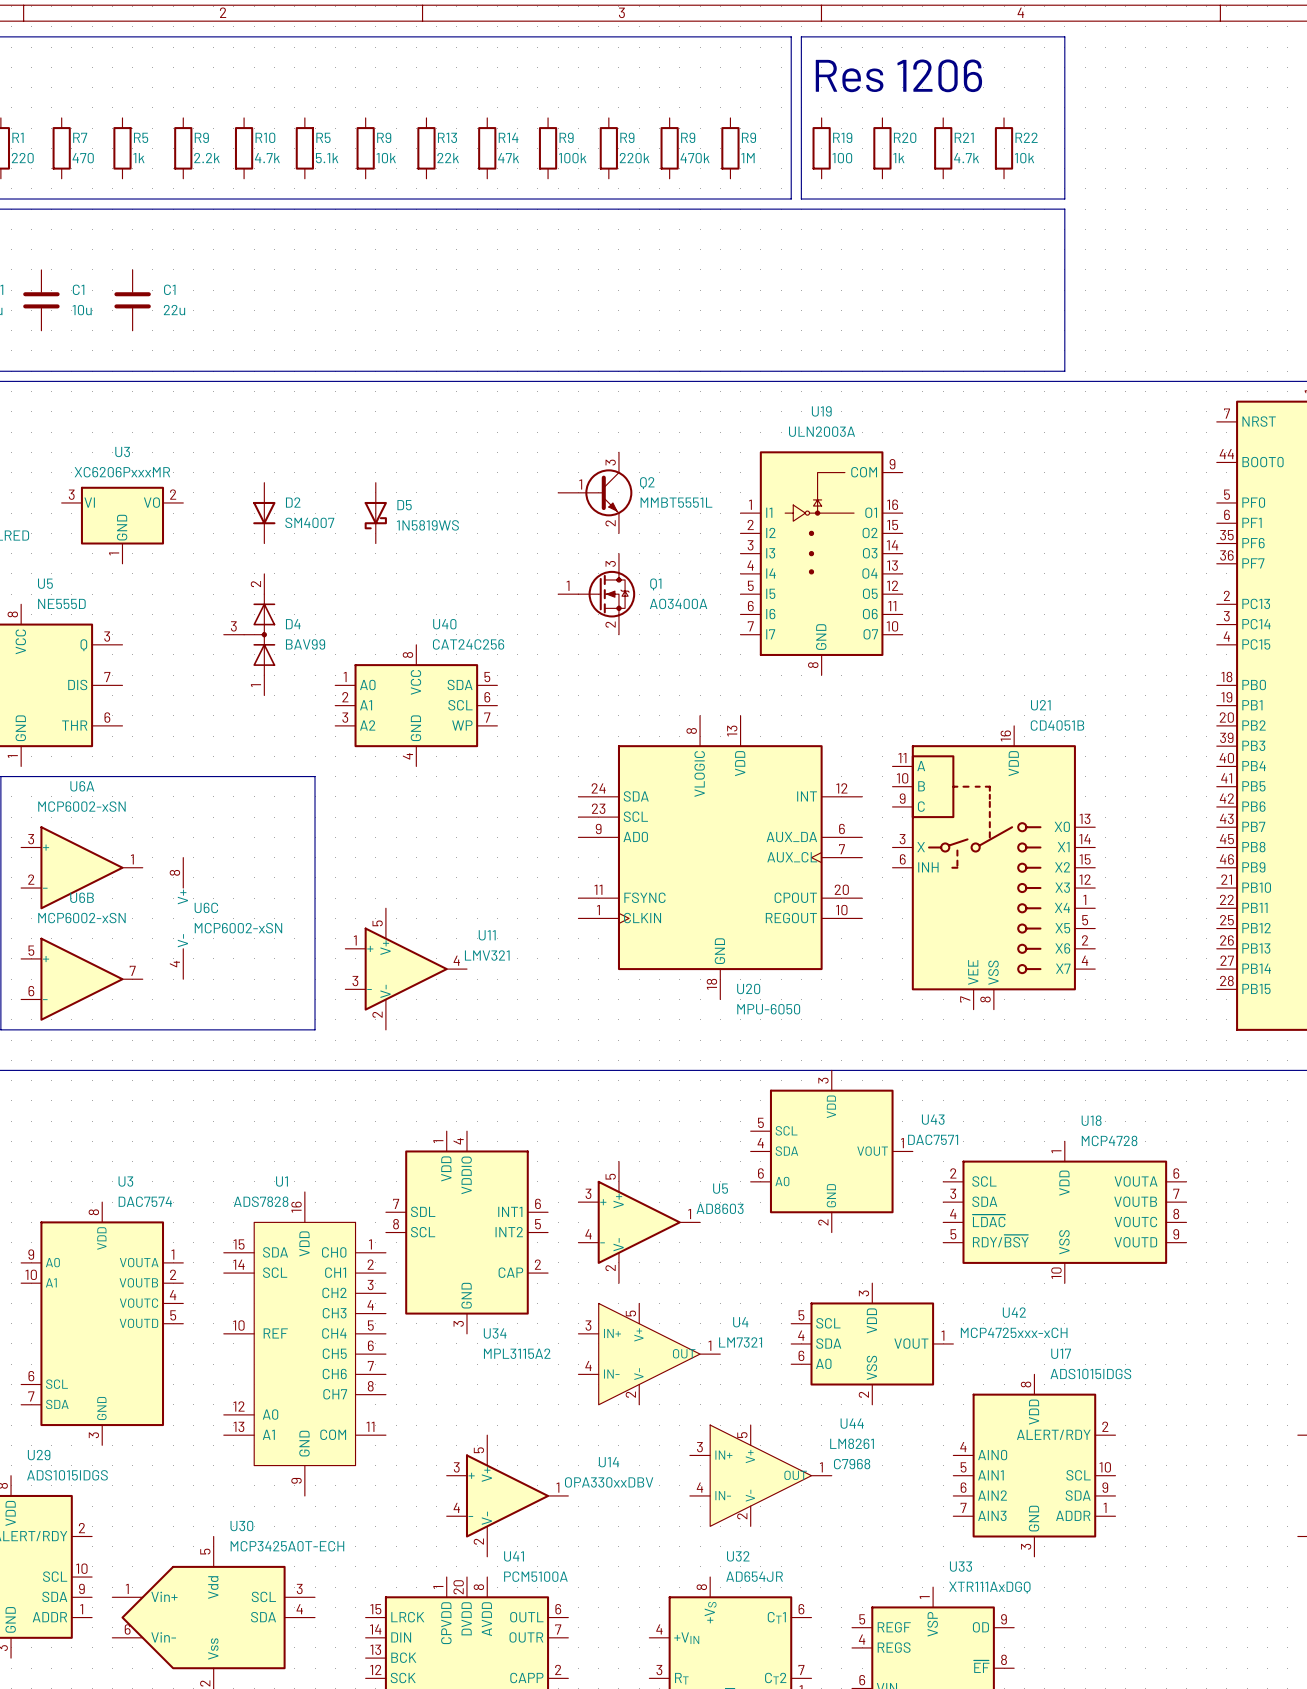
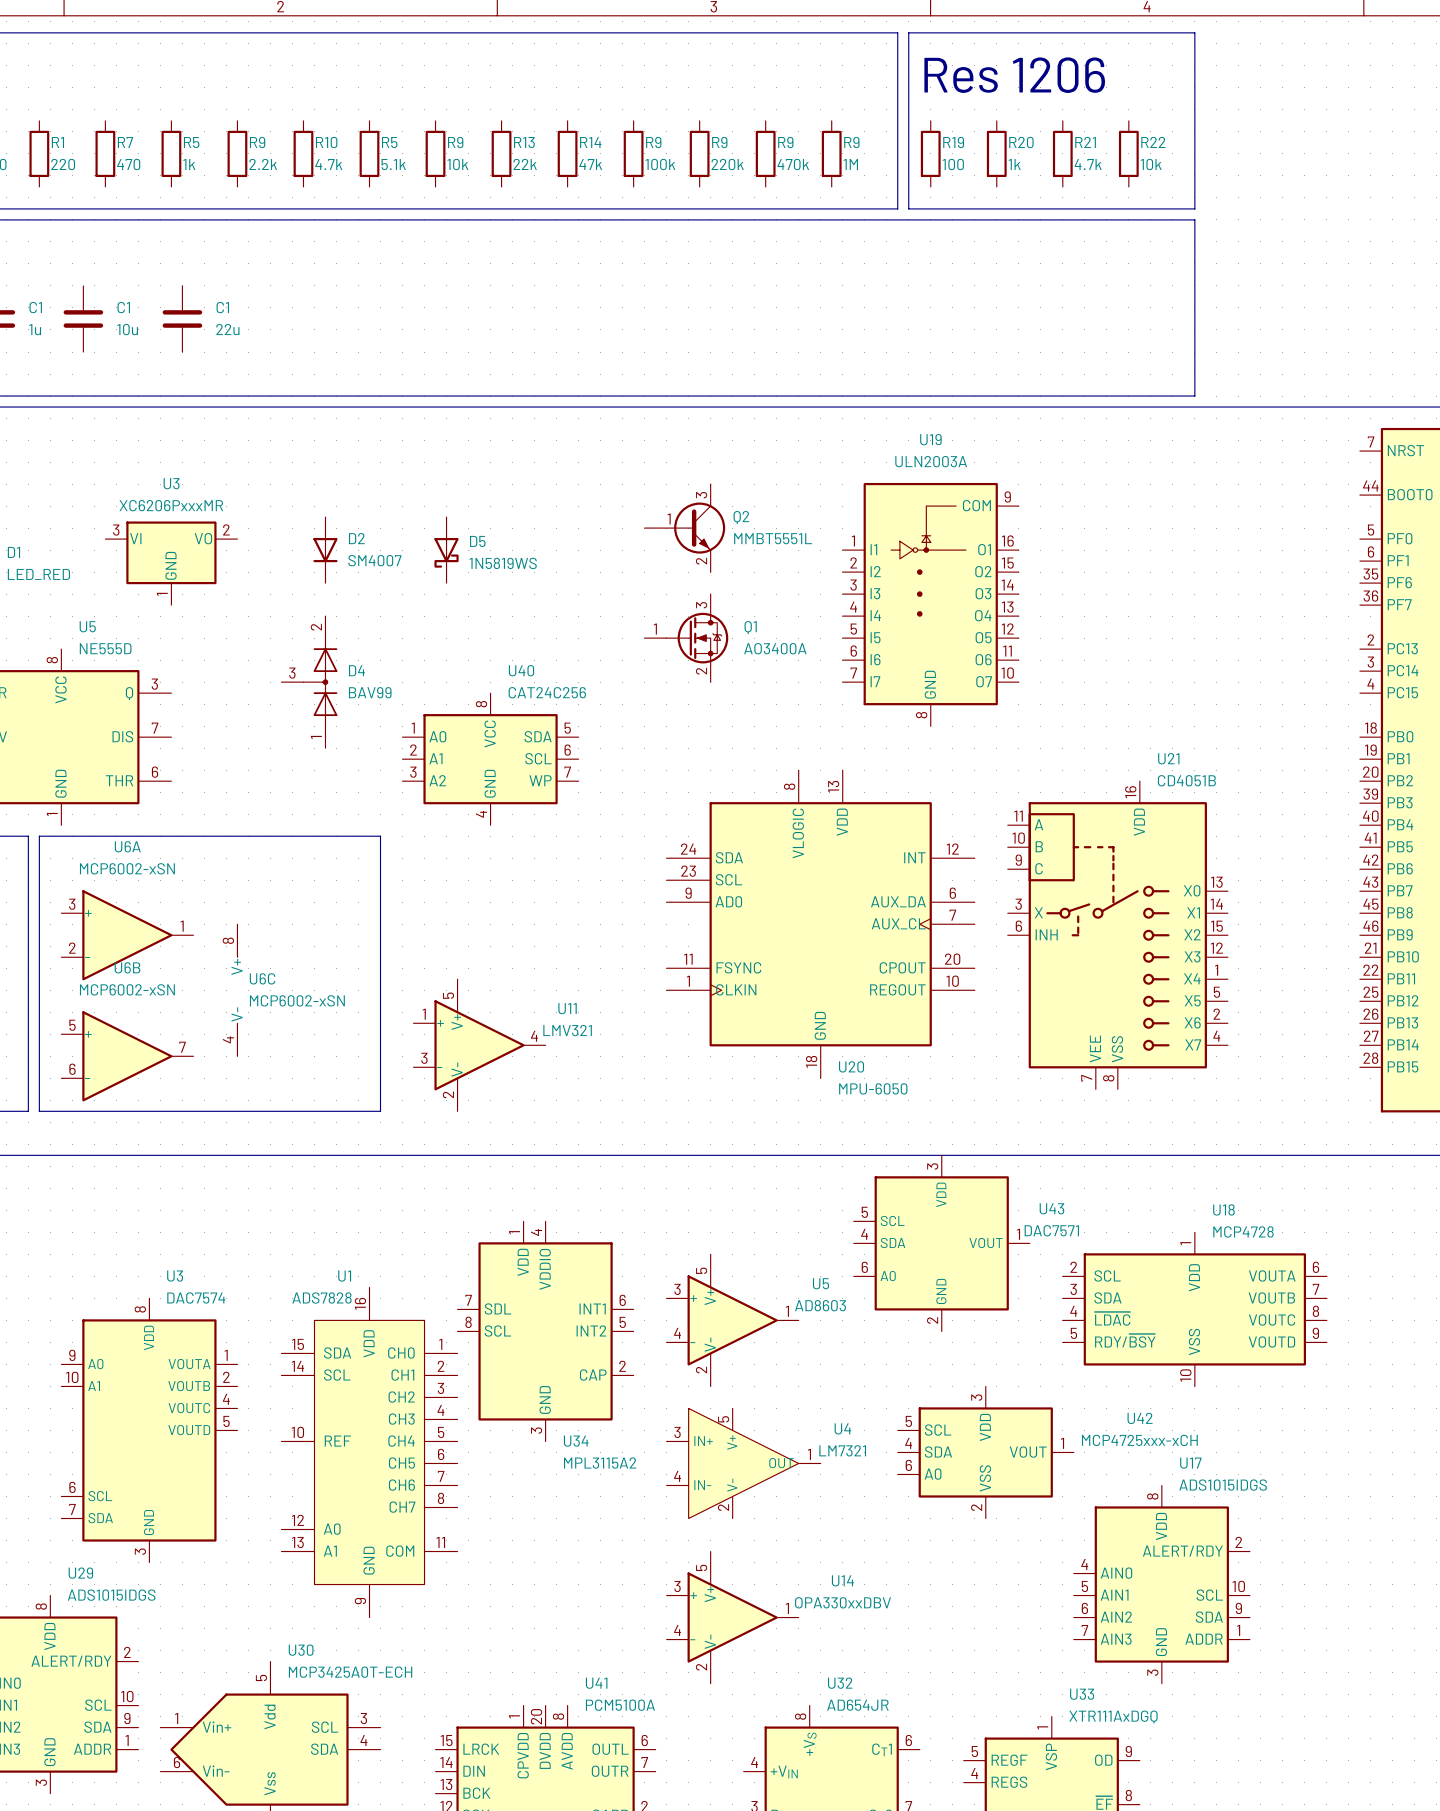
U44: LM8261 (760, 1475) -> none
U14 position: (507, 1495) -> (732, 1617)

